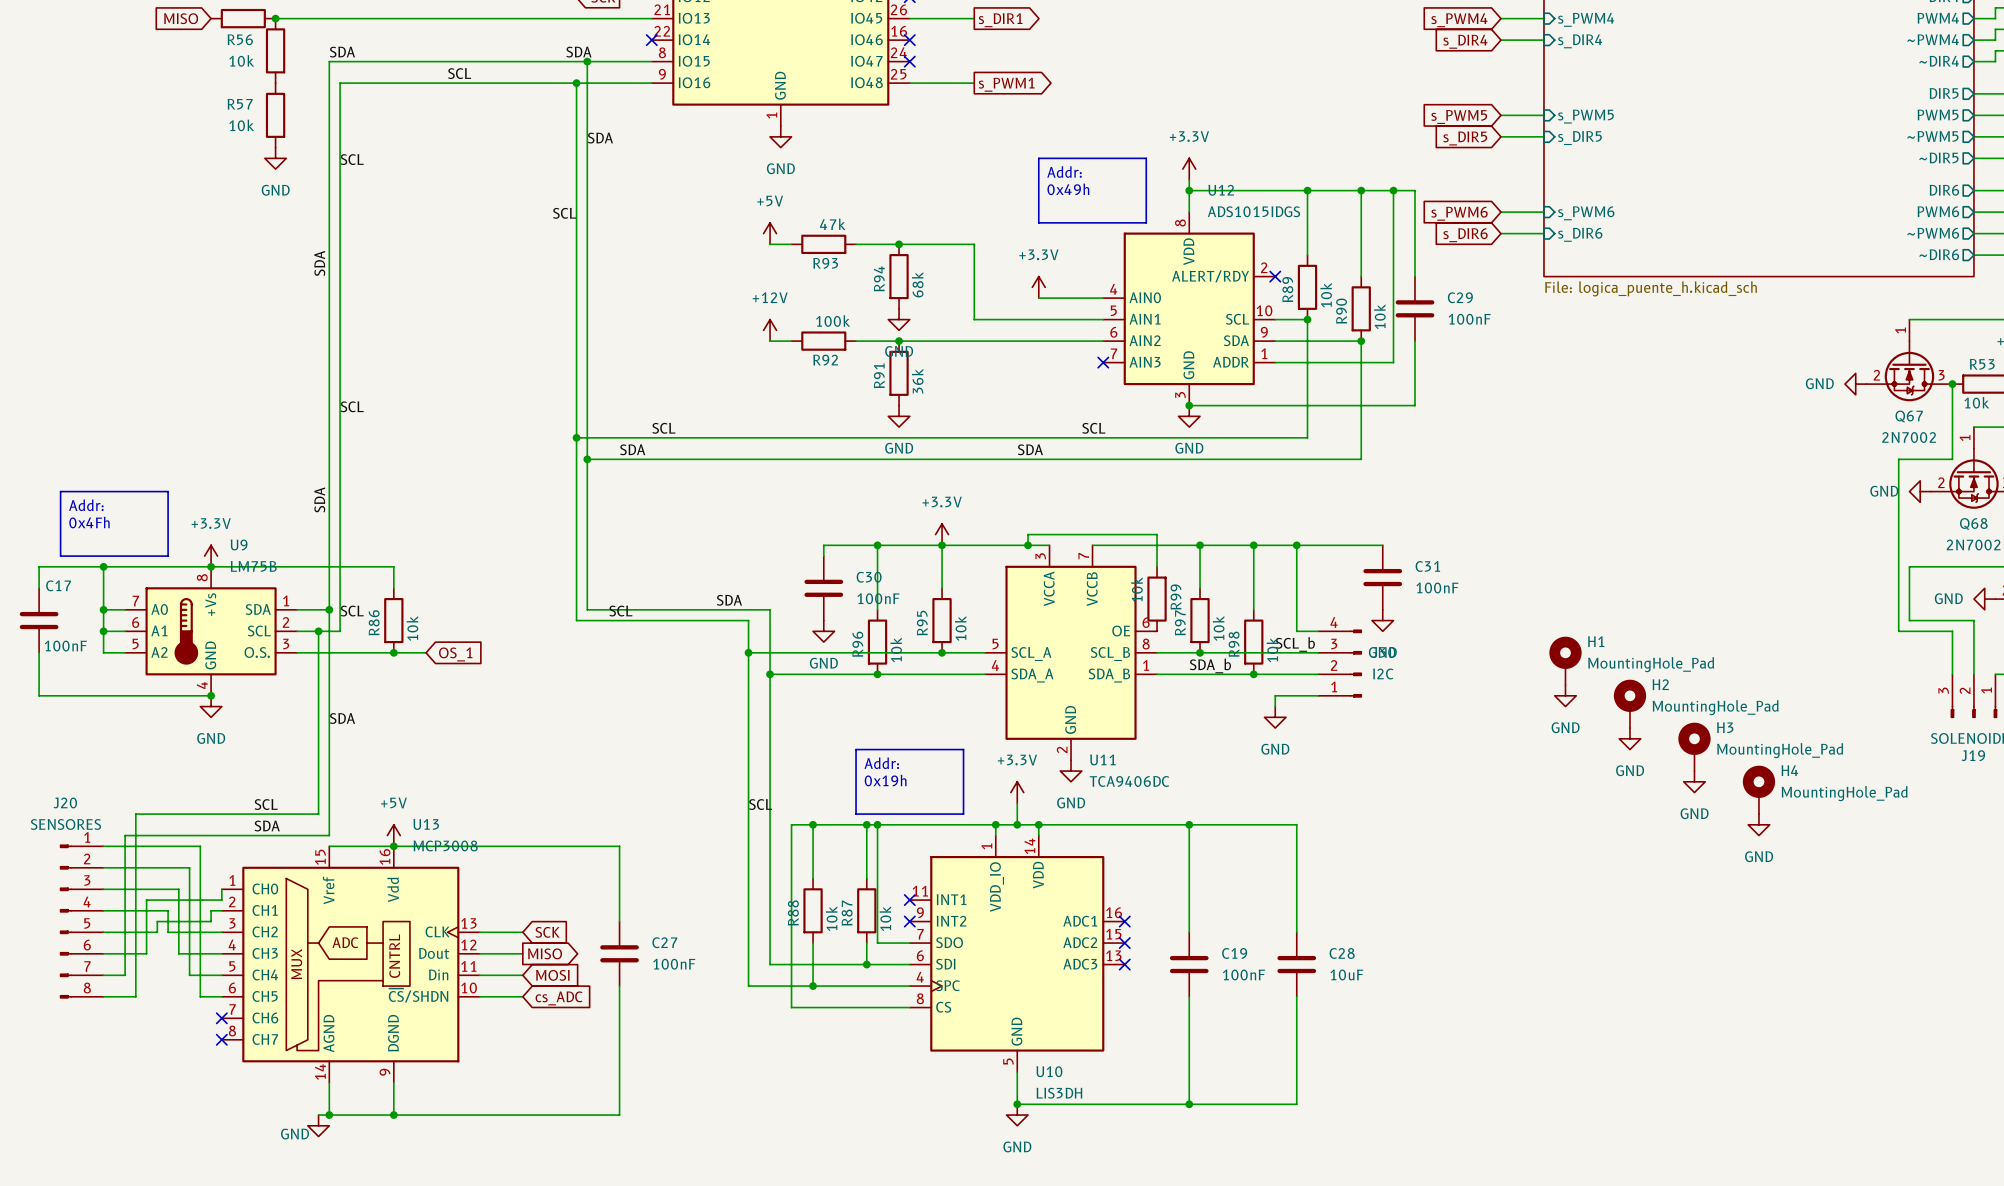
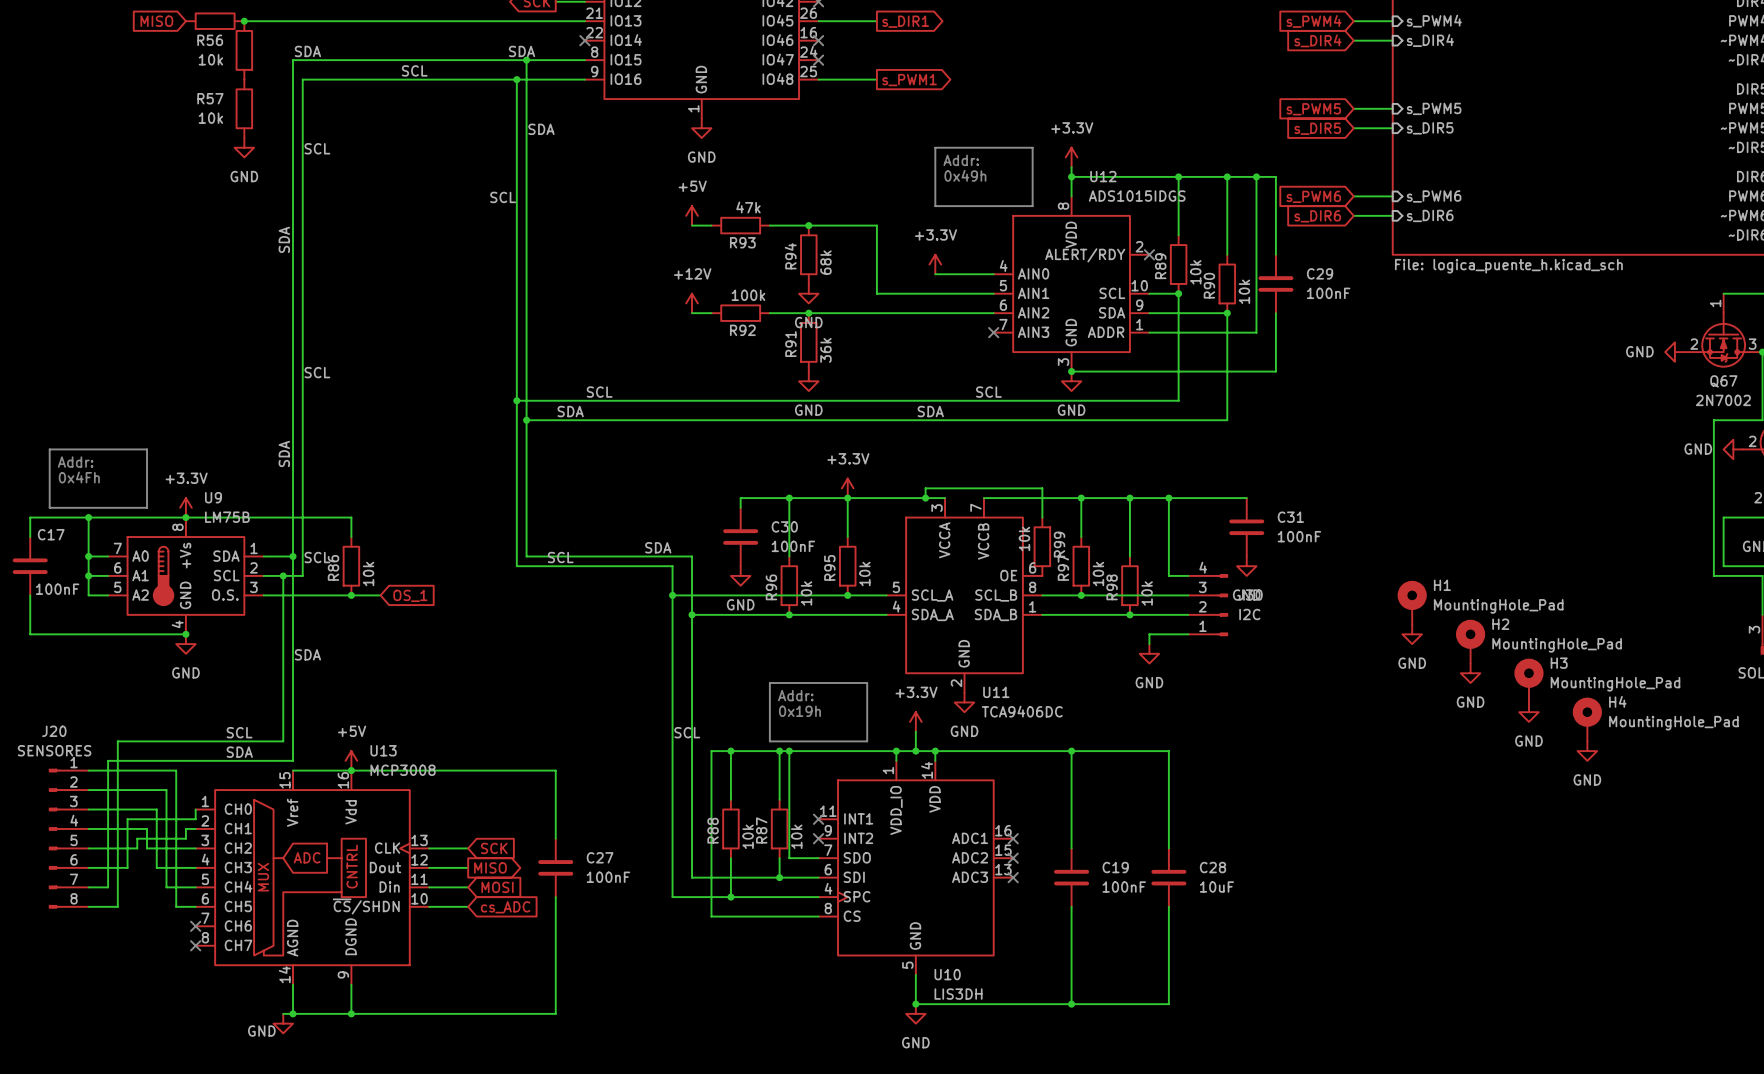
label: SCL_b (1295, 644) -> none
label: SDA_b (1210, 665) -> none

